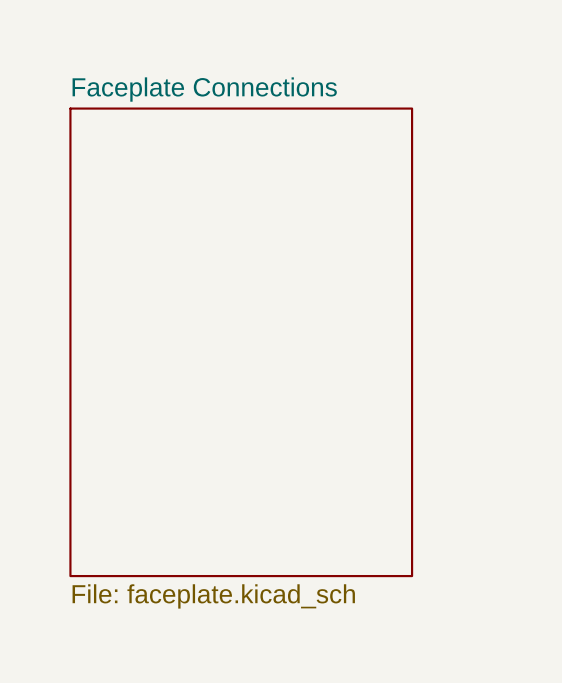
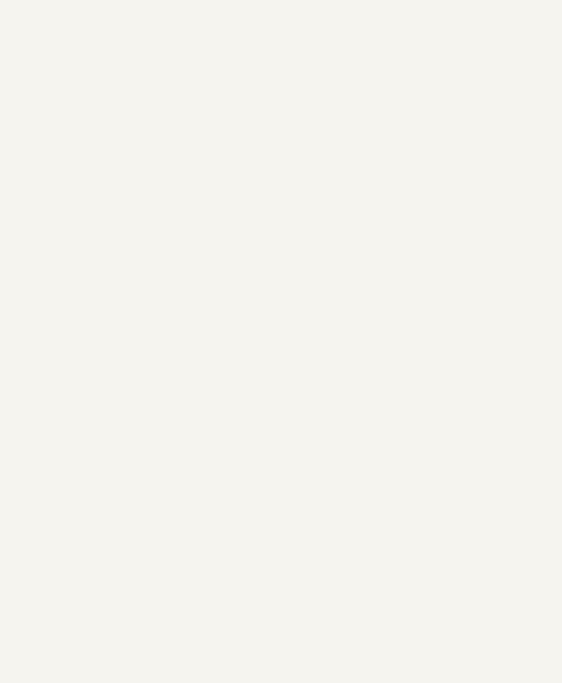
sheet Faceplate Connections: File: faceplate.kicad_sch (241, 342) -> none

